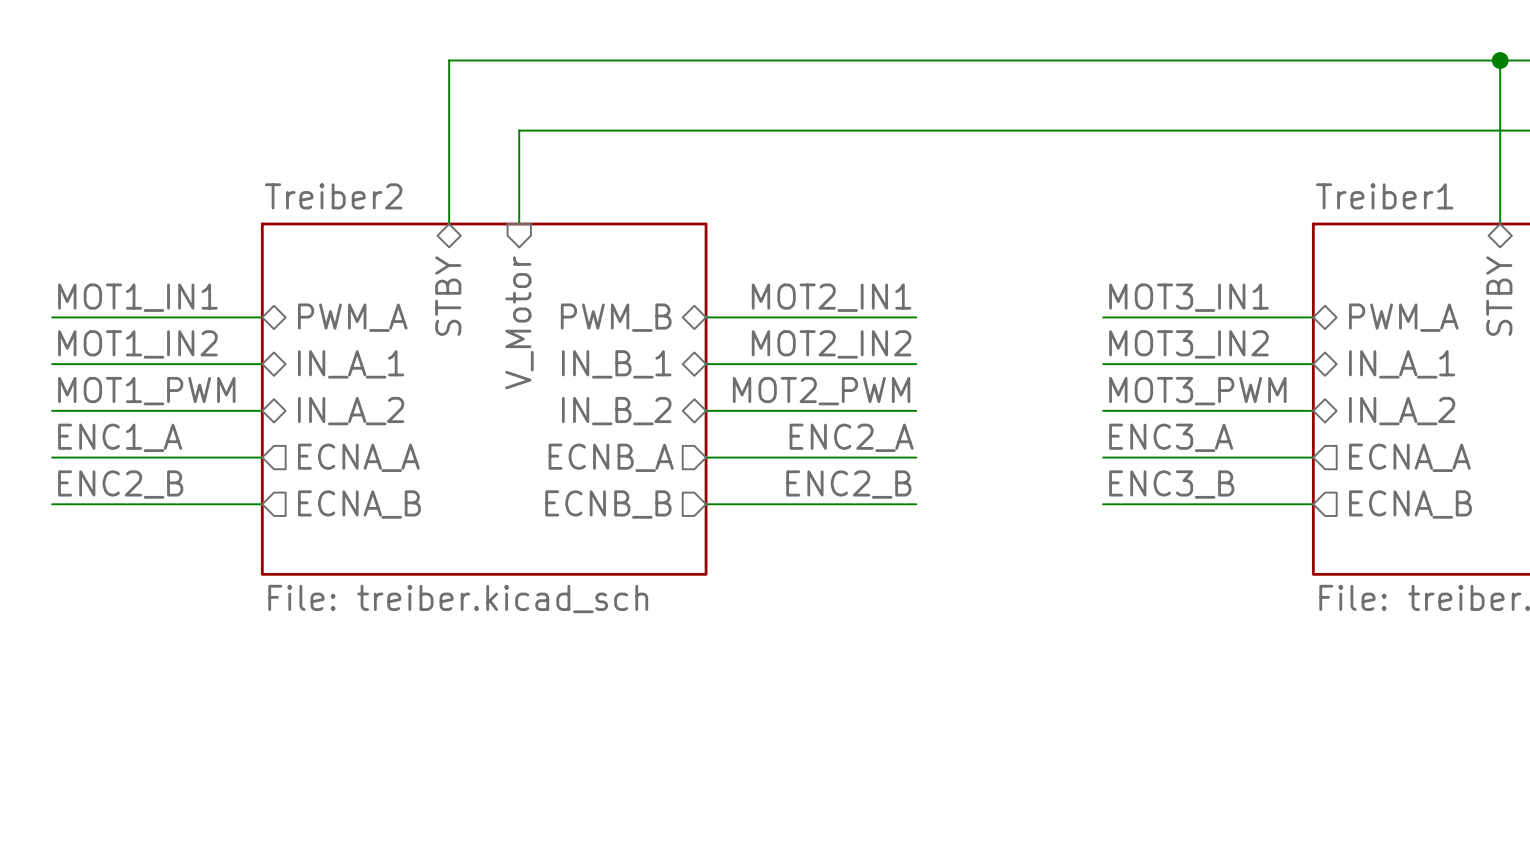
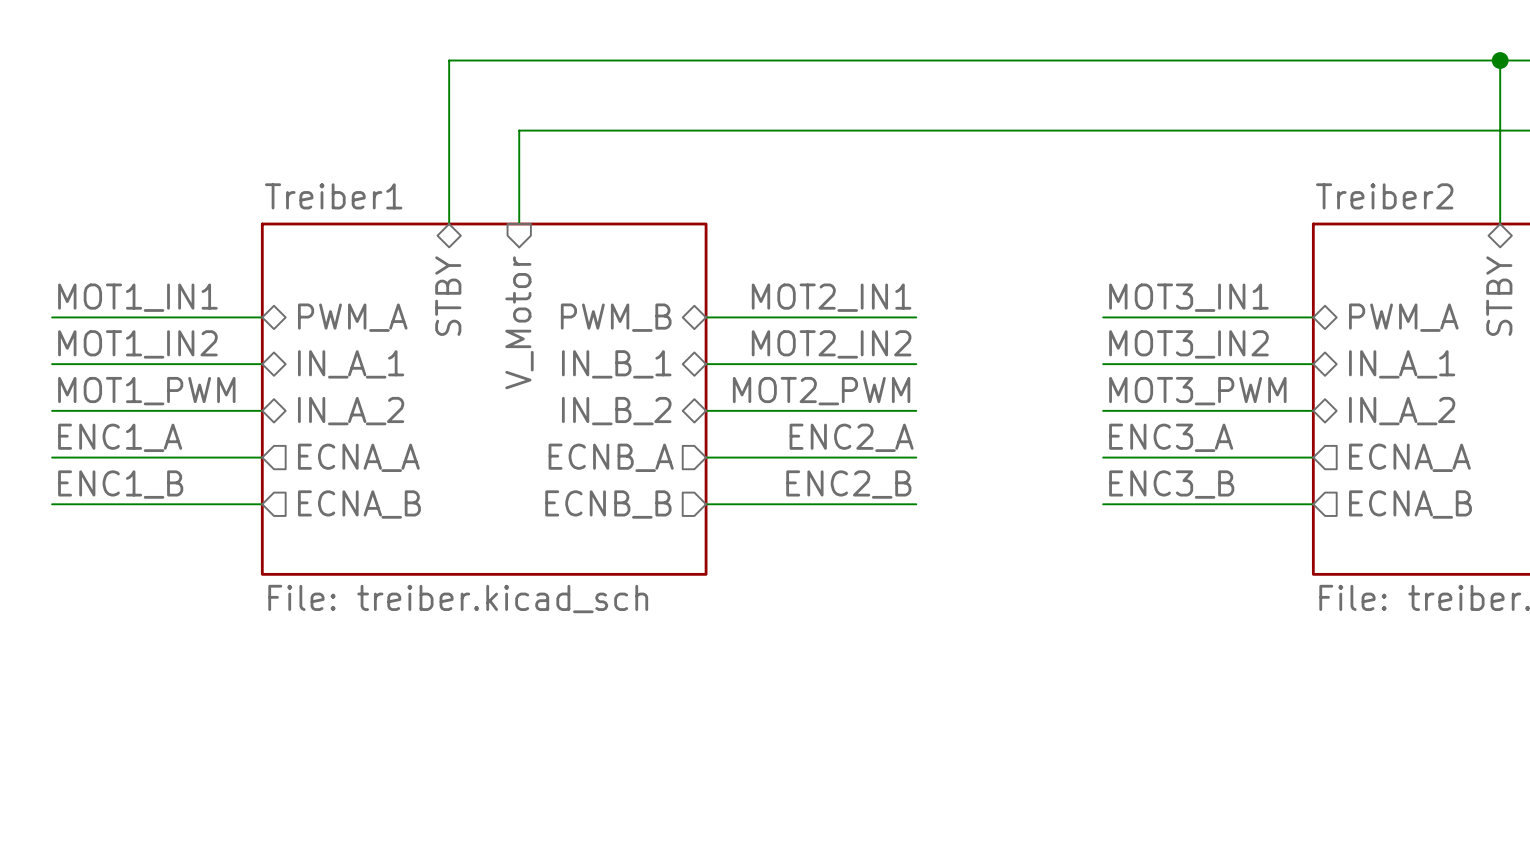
sheet Treiber2 name: Treiber2 (333, 196) -> Treiber1 (333, 196)
sheet Treiber1 name: Treiber1 (1384, 196) -> Treiber2 (1384, 196)
label: ENC2_B (120, 484) -> ENC1_B (120, 484)

